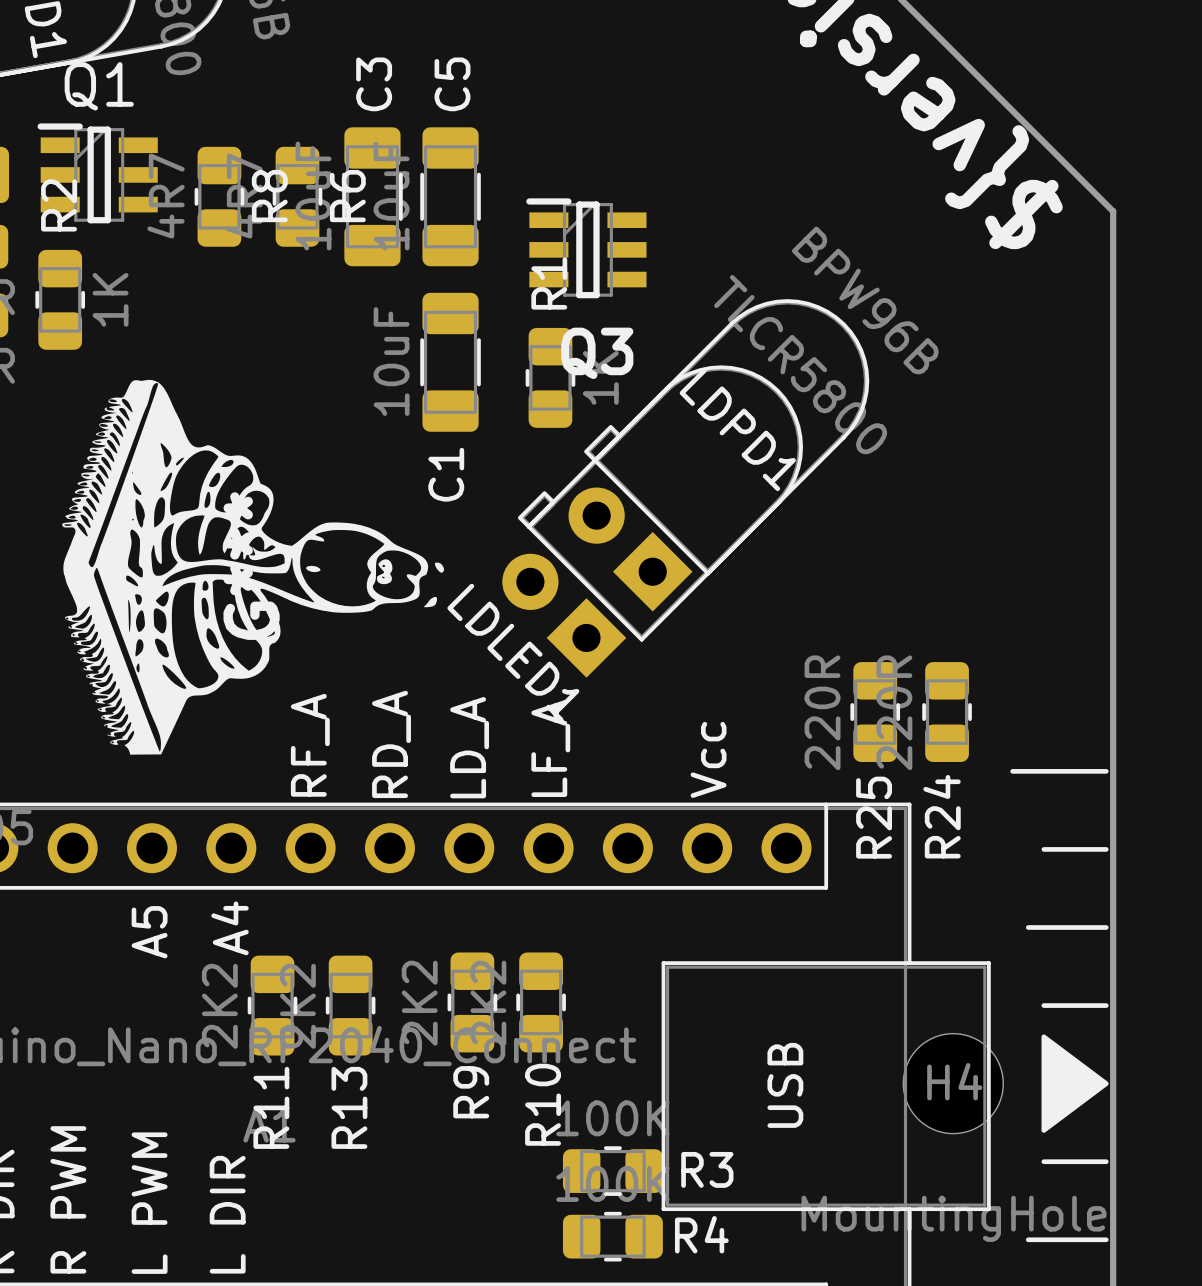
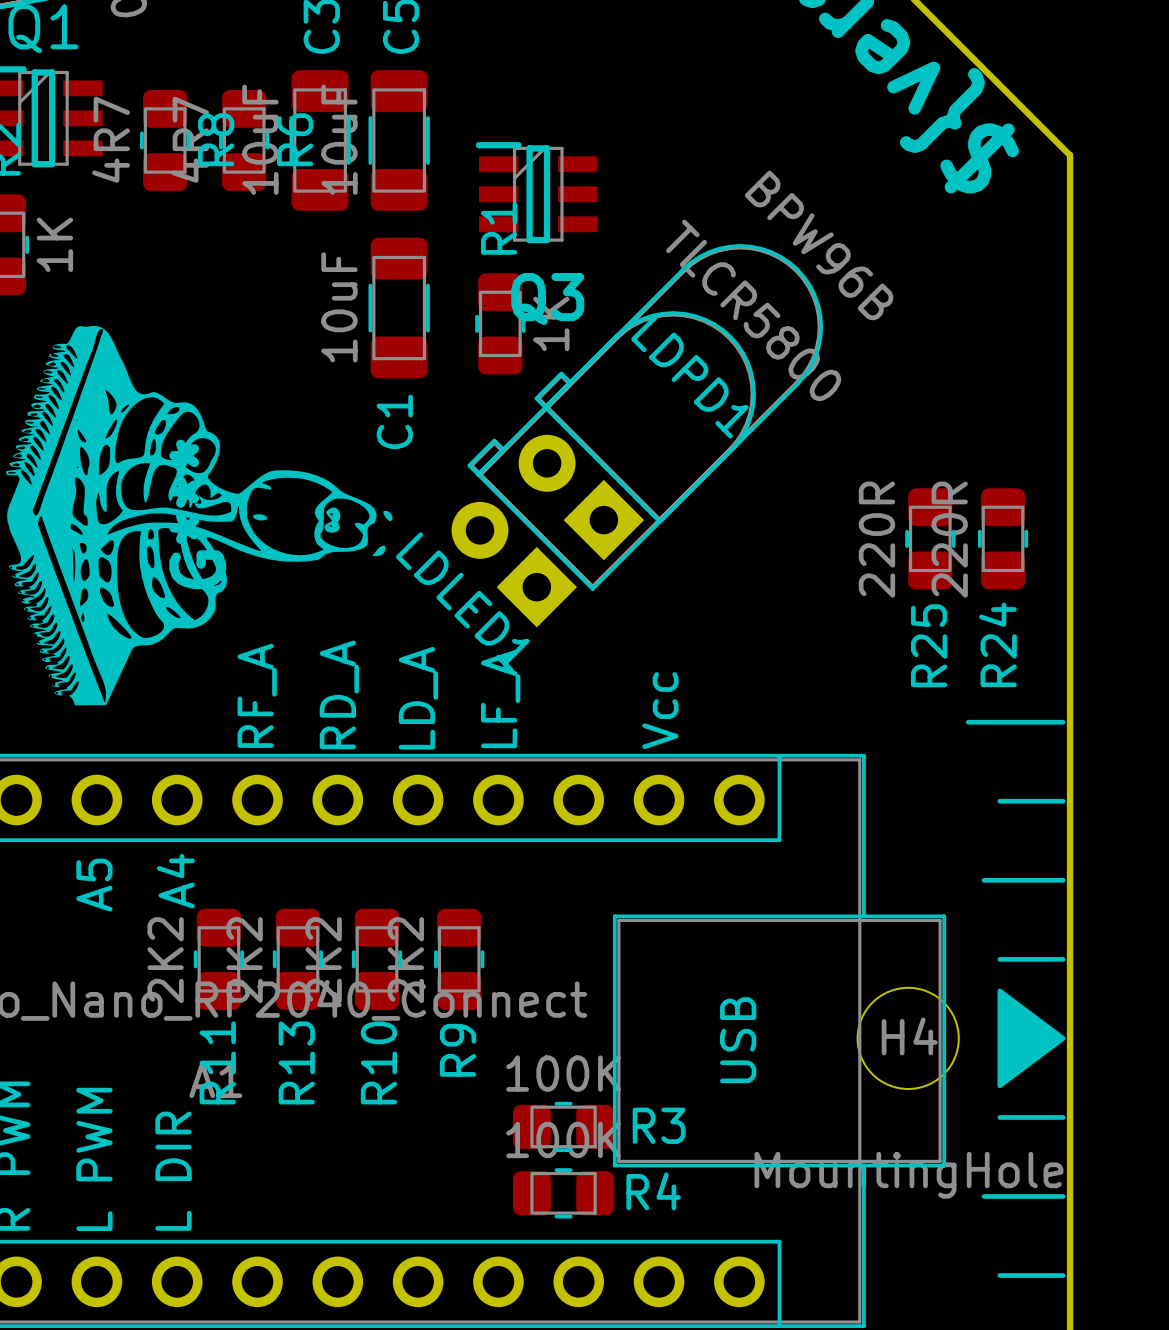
R25 position: (875, 712) -> (930, 538)
R24 position: (947, 712) -> (1003, 538)
R9 position: (472, 1002) -> (459, 959)
R10 position: (541, 1002) -> (377, 959)

